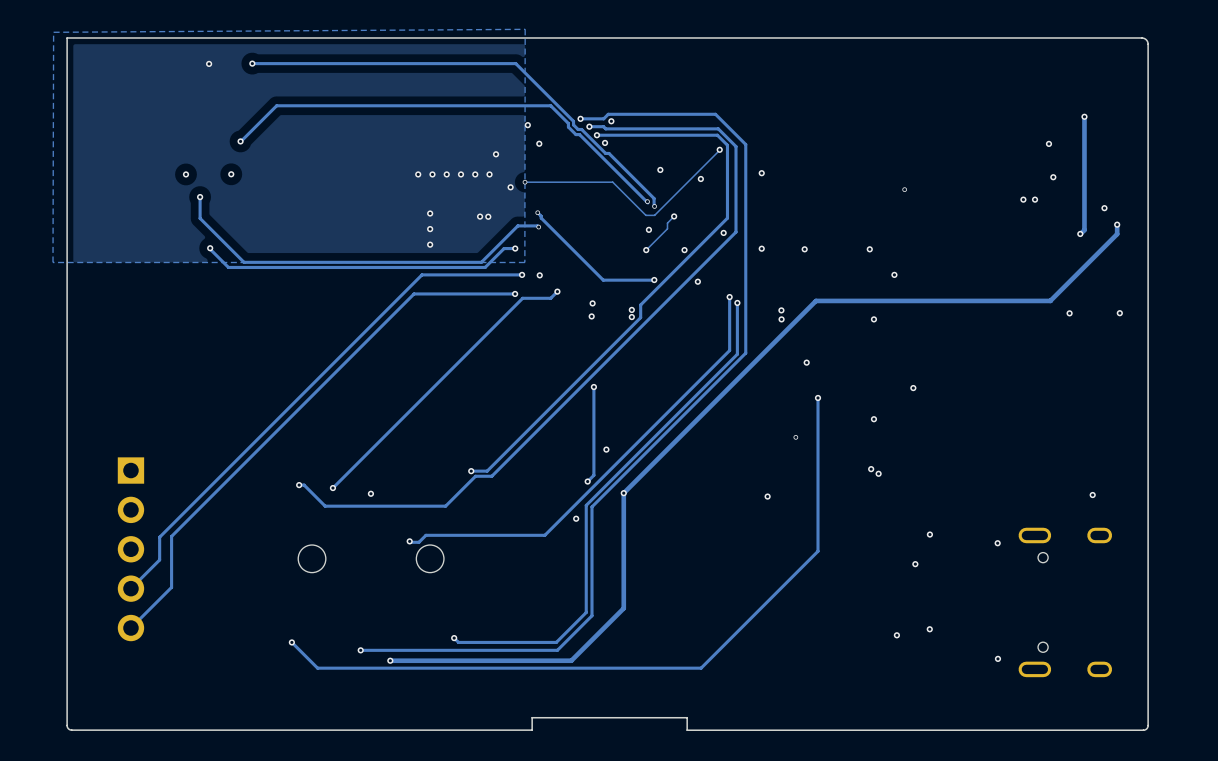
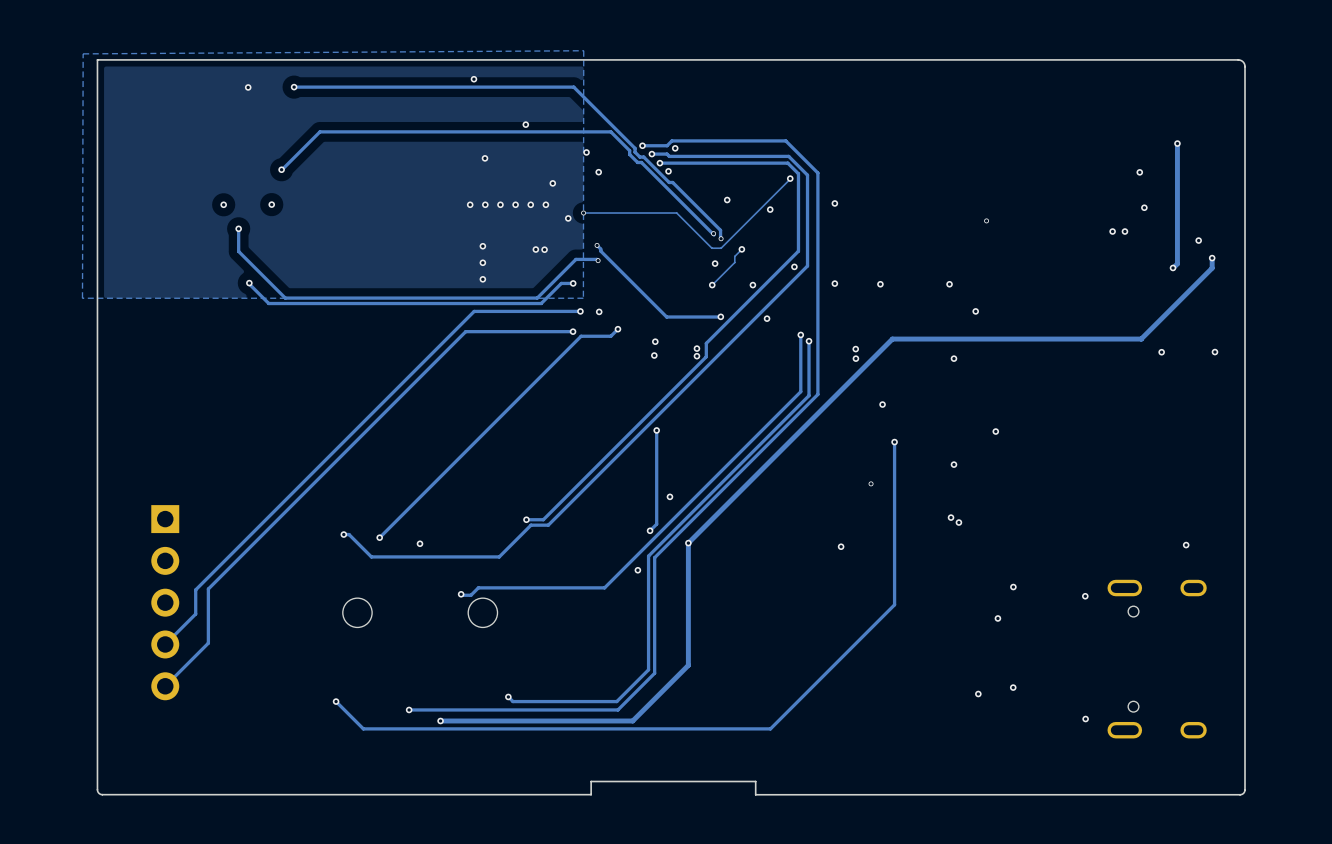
via: none -> (473, 79)
via: none -> (525, 124)
via: none -> (485, 158)

